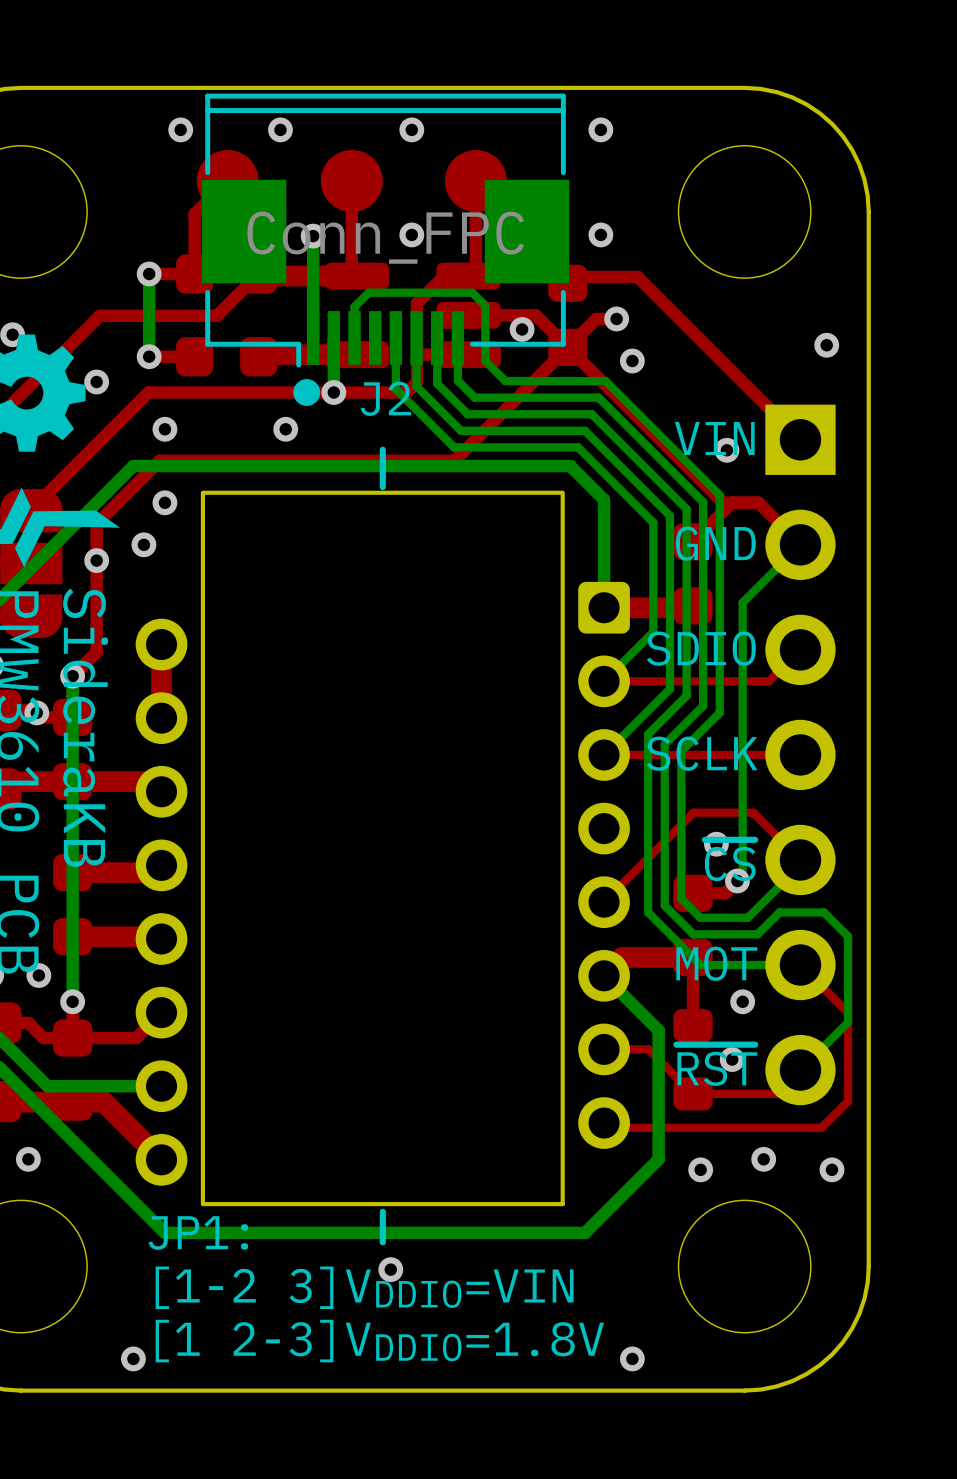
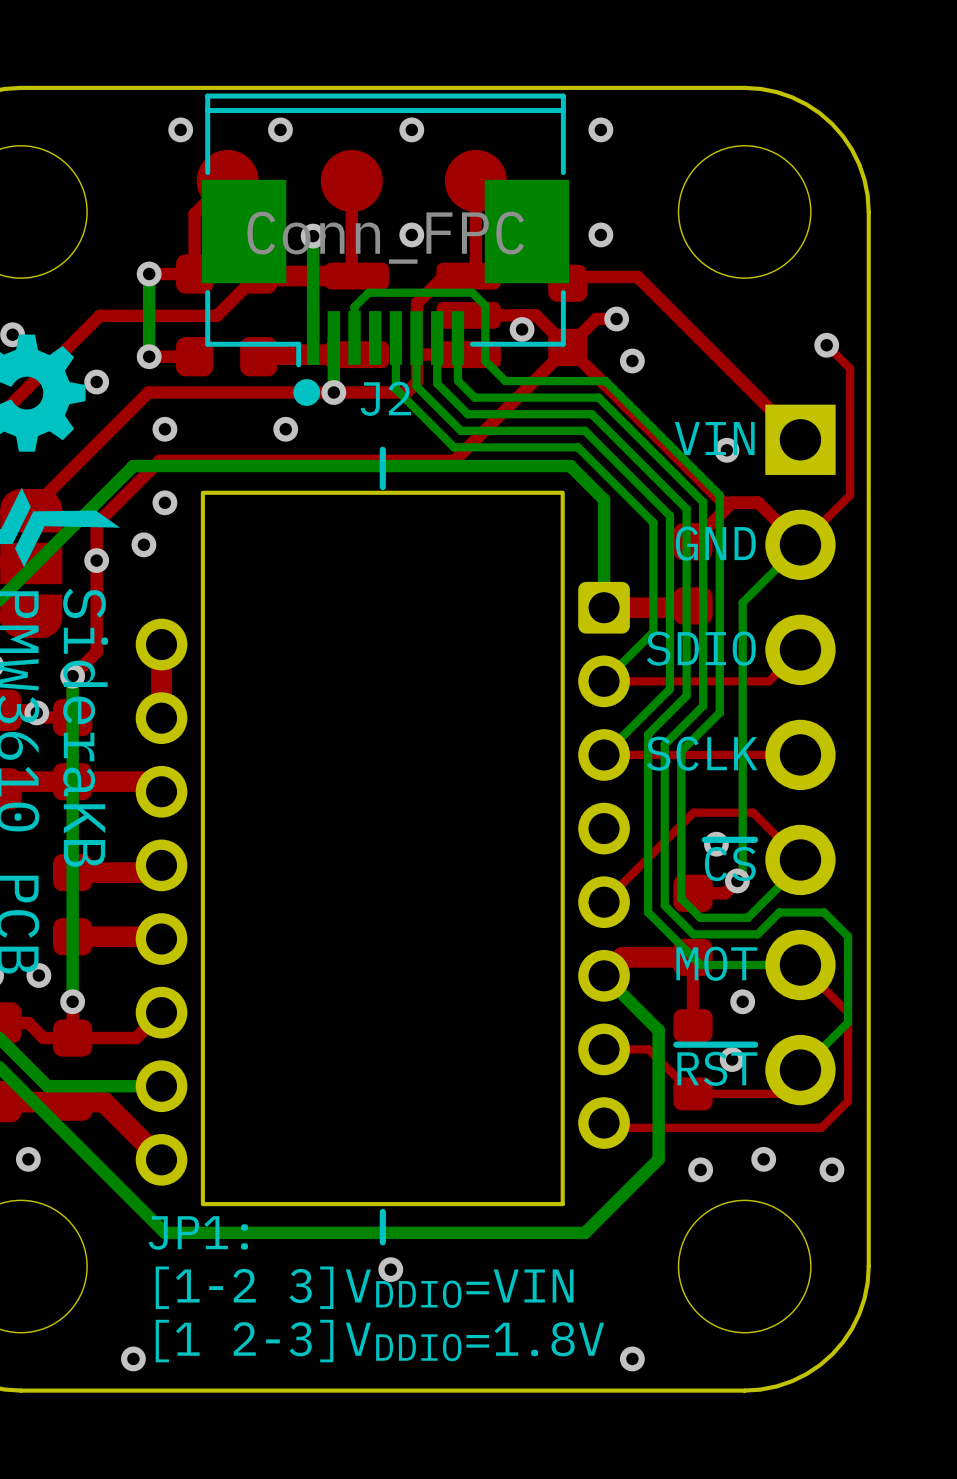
top track: none -> (826, 345) (850, 368) (850, 495) (800, 544)

